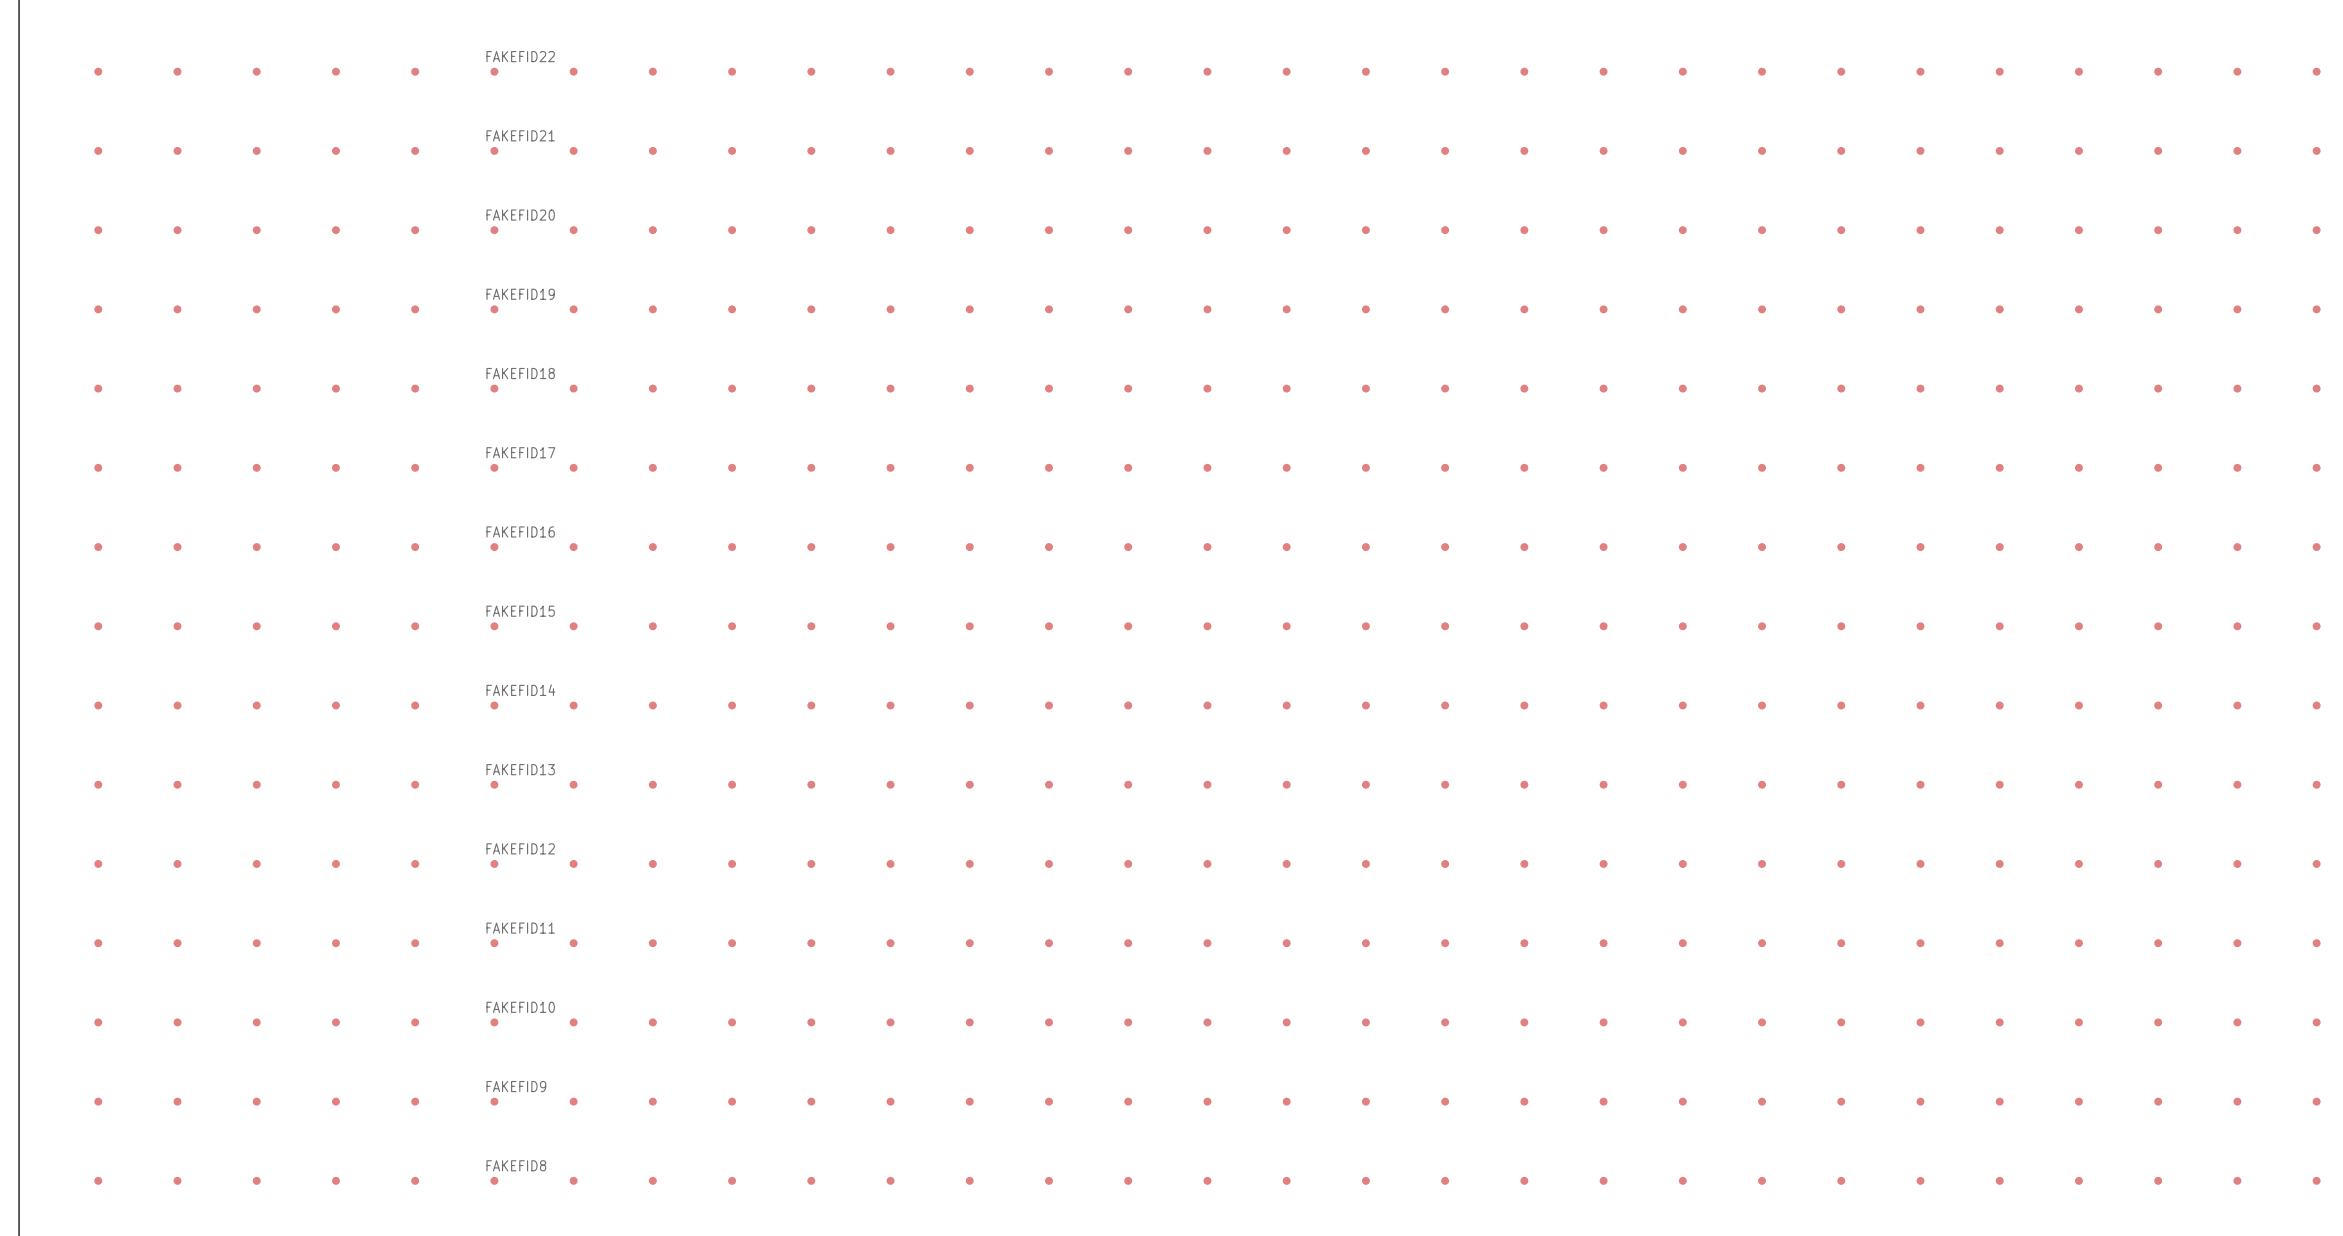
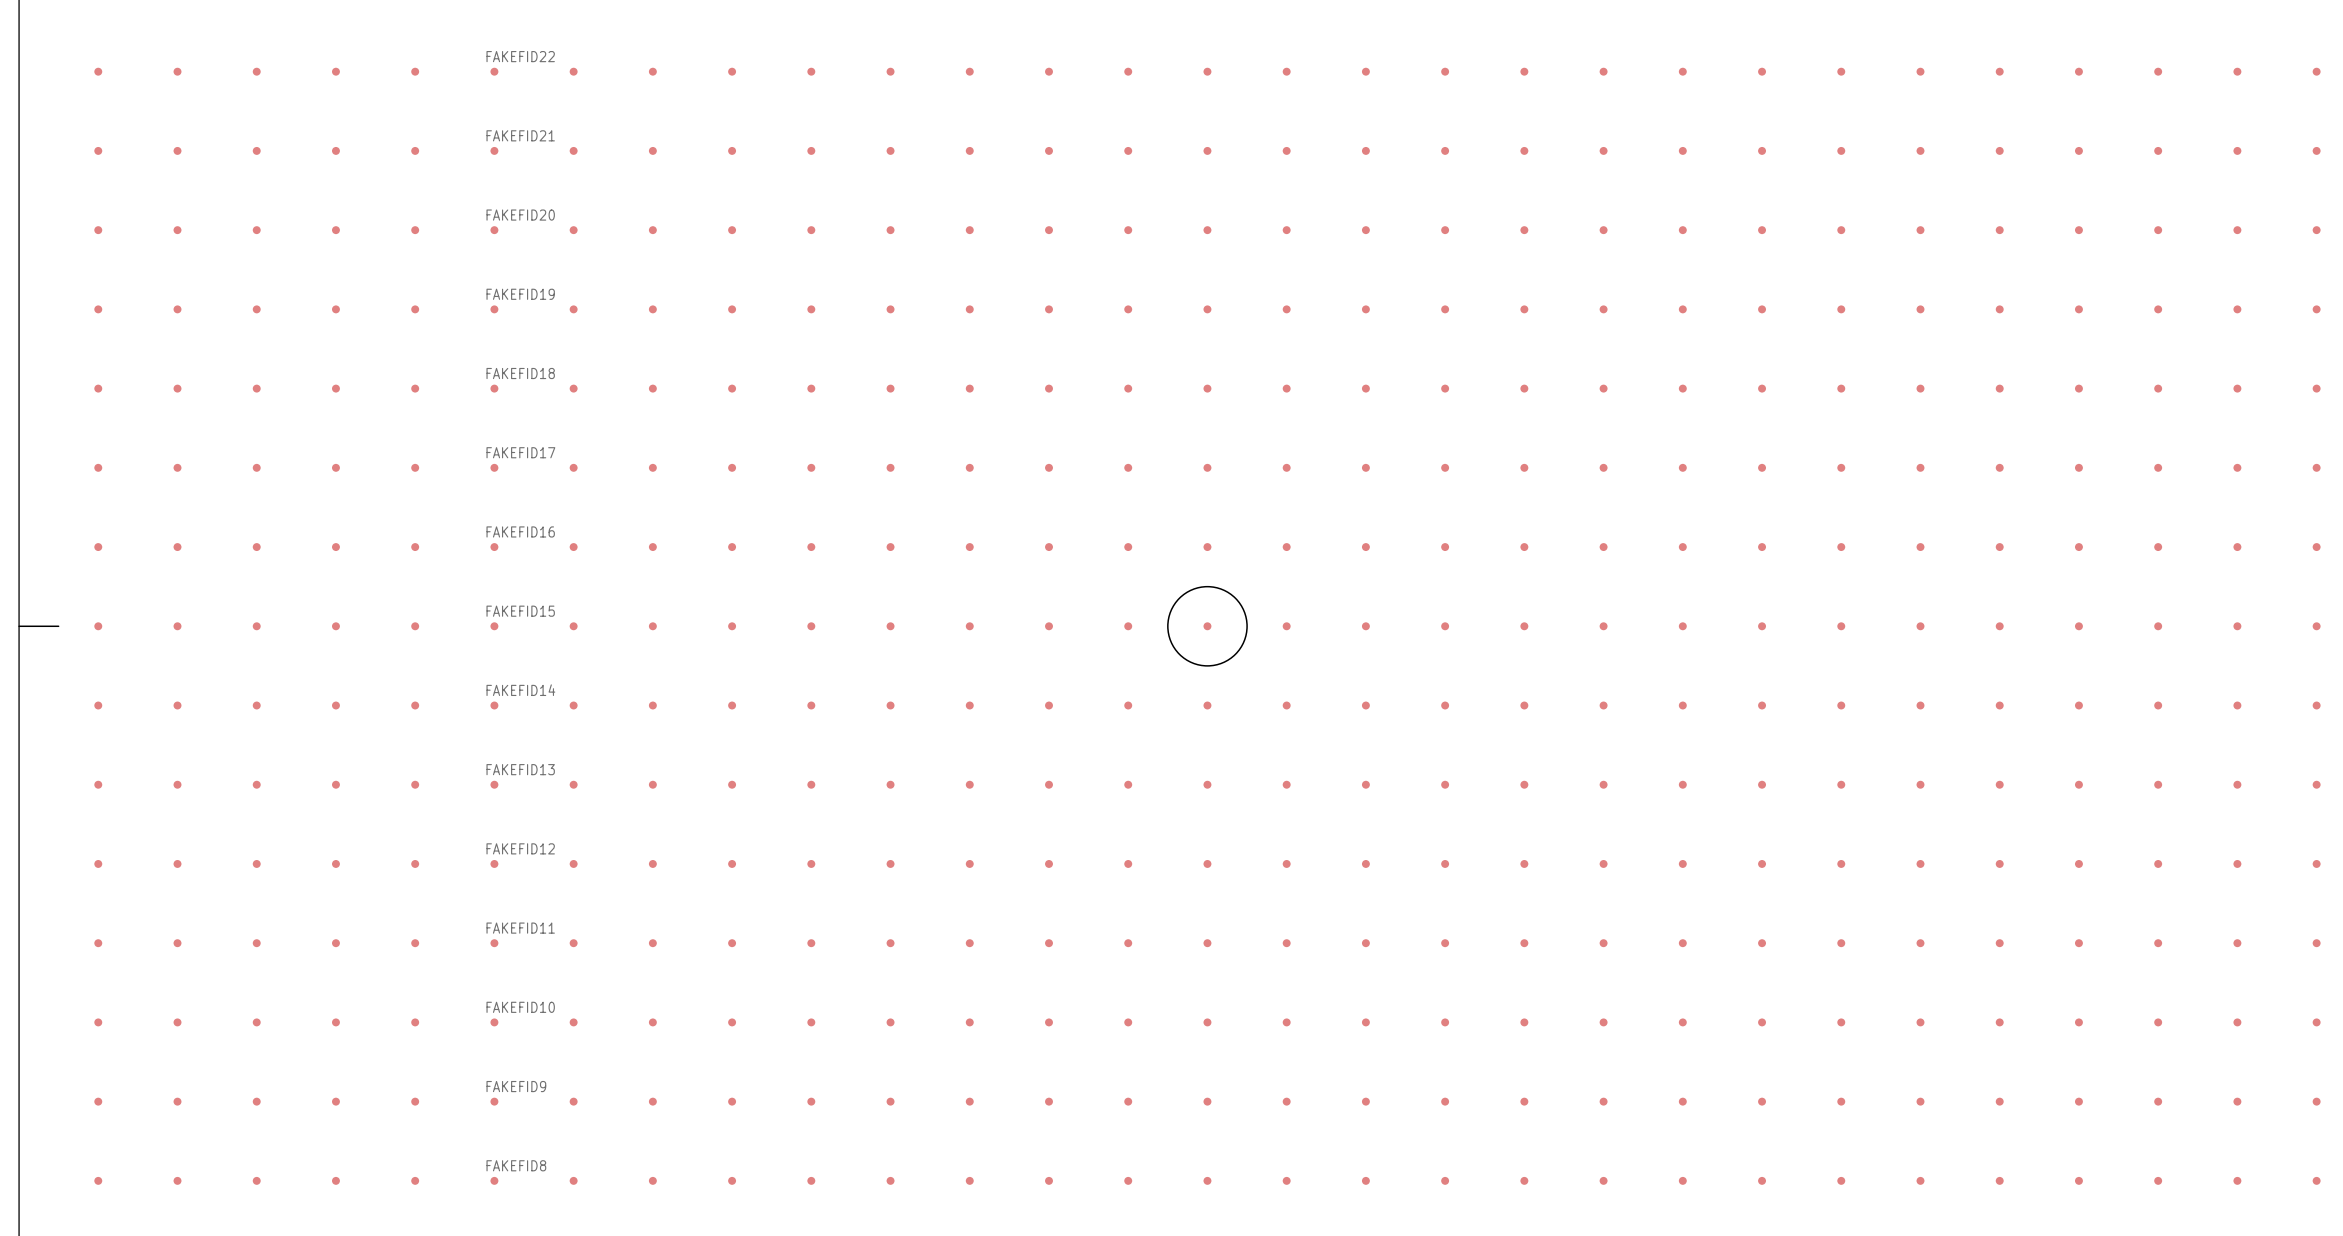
drawing: none -> [1167, 585, 1248, 667]
line: none -> (19, 626) (58, 626)

